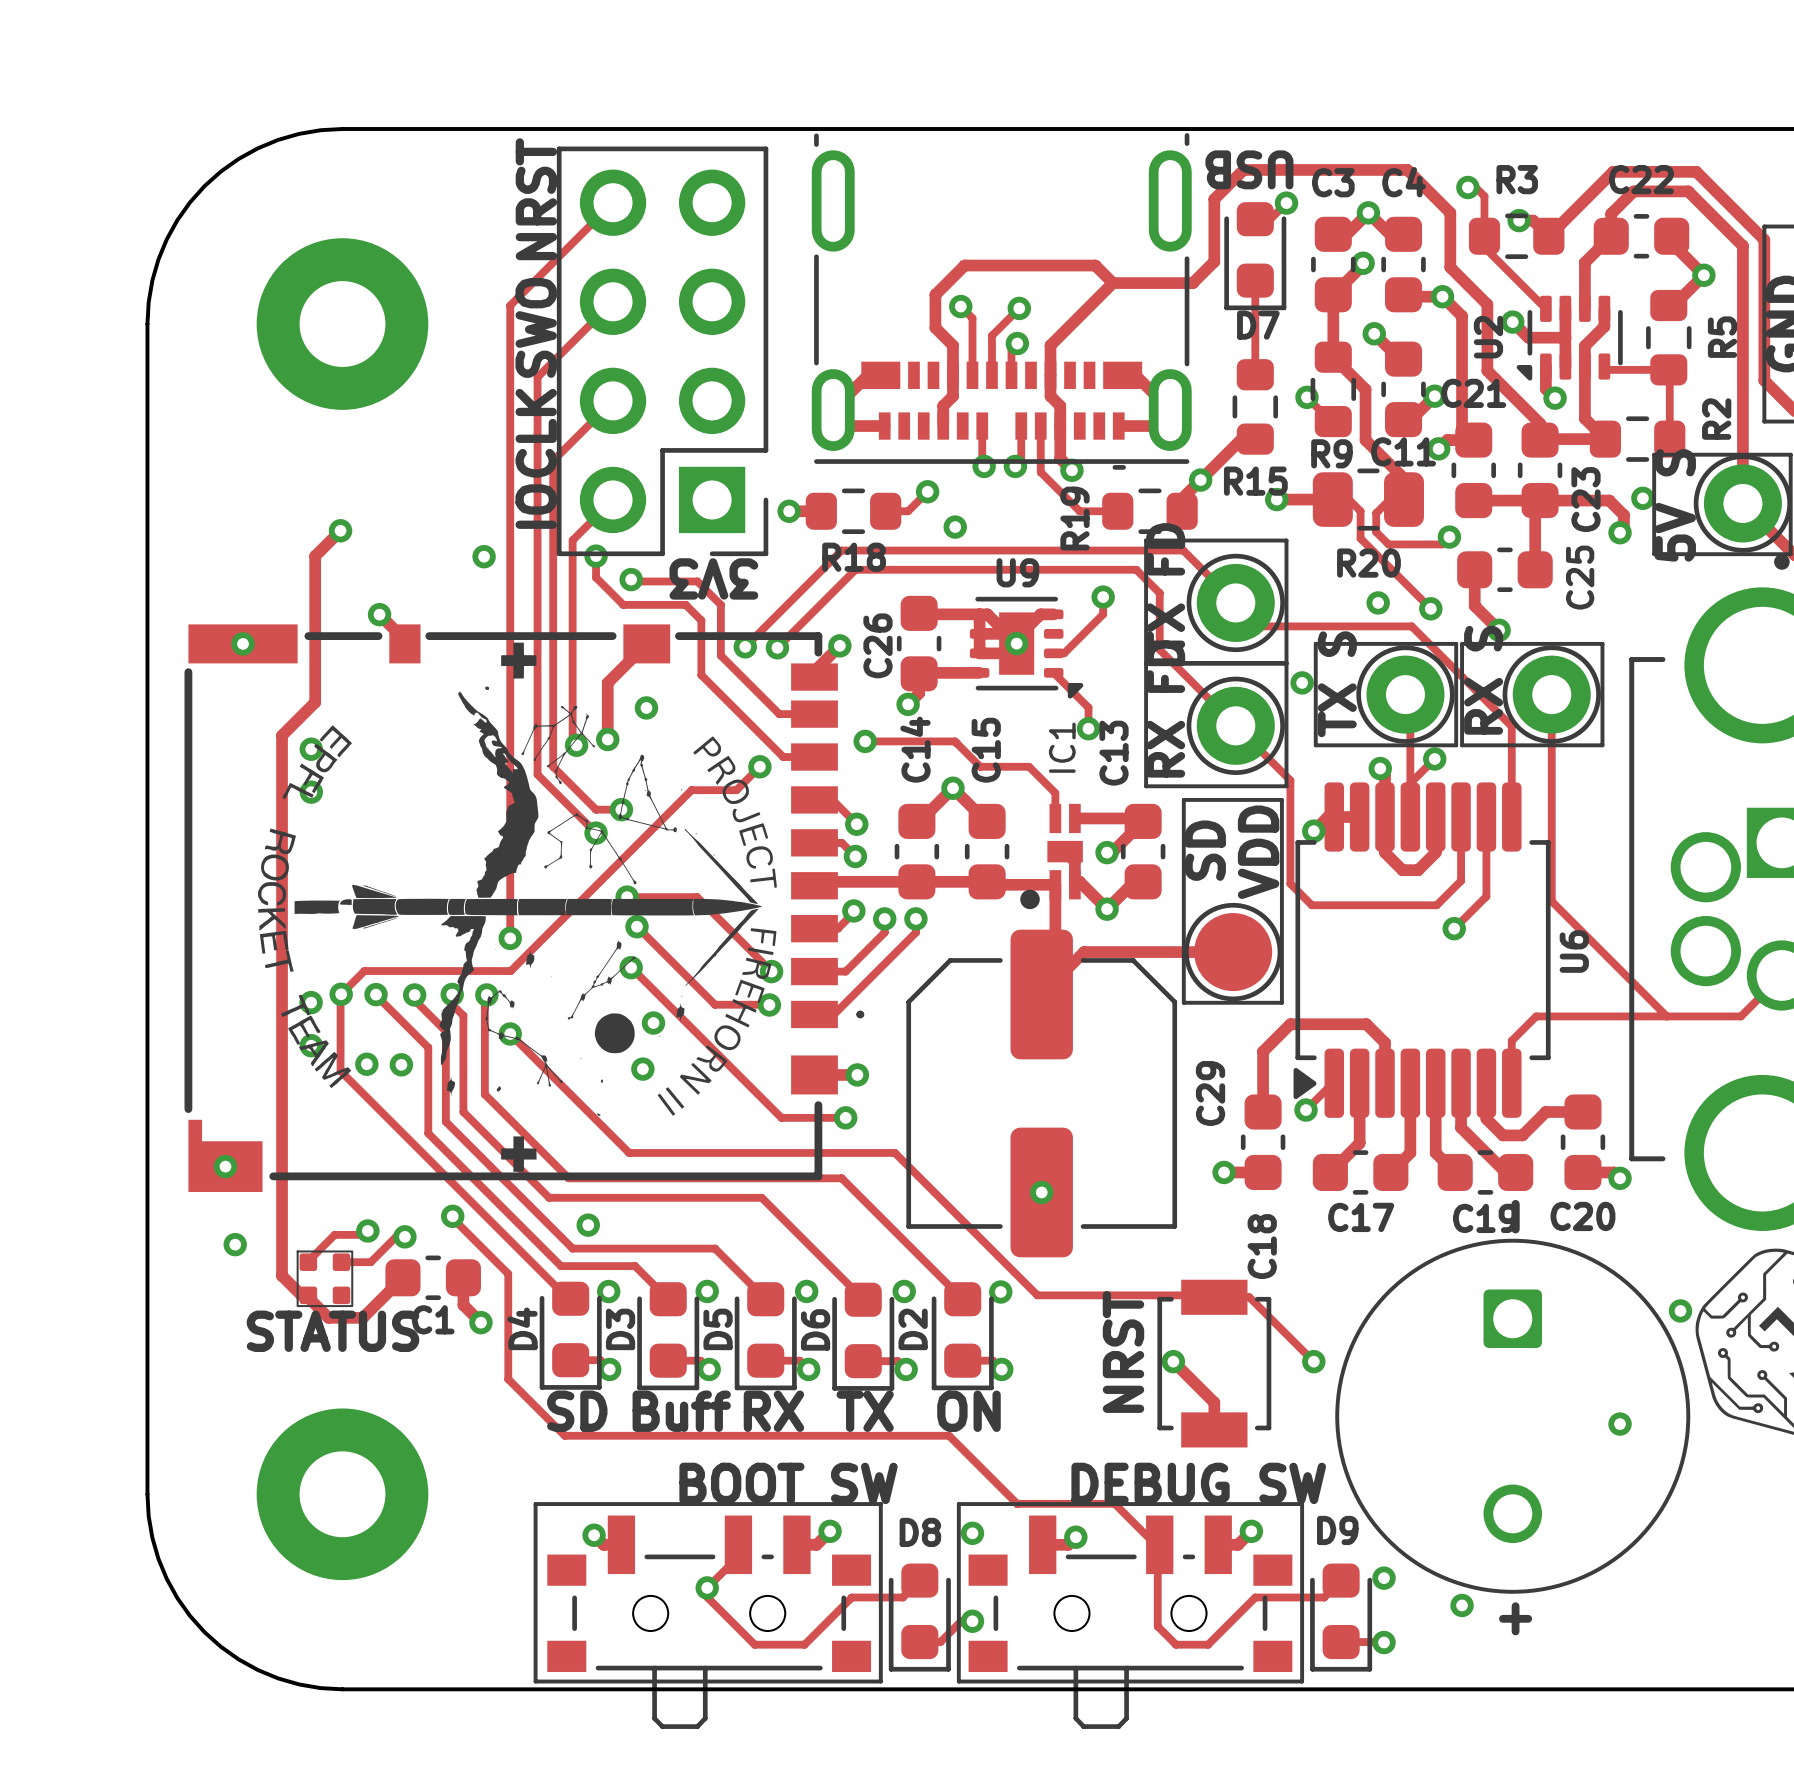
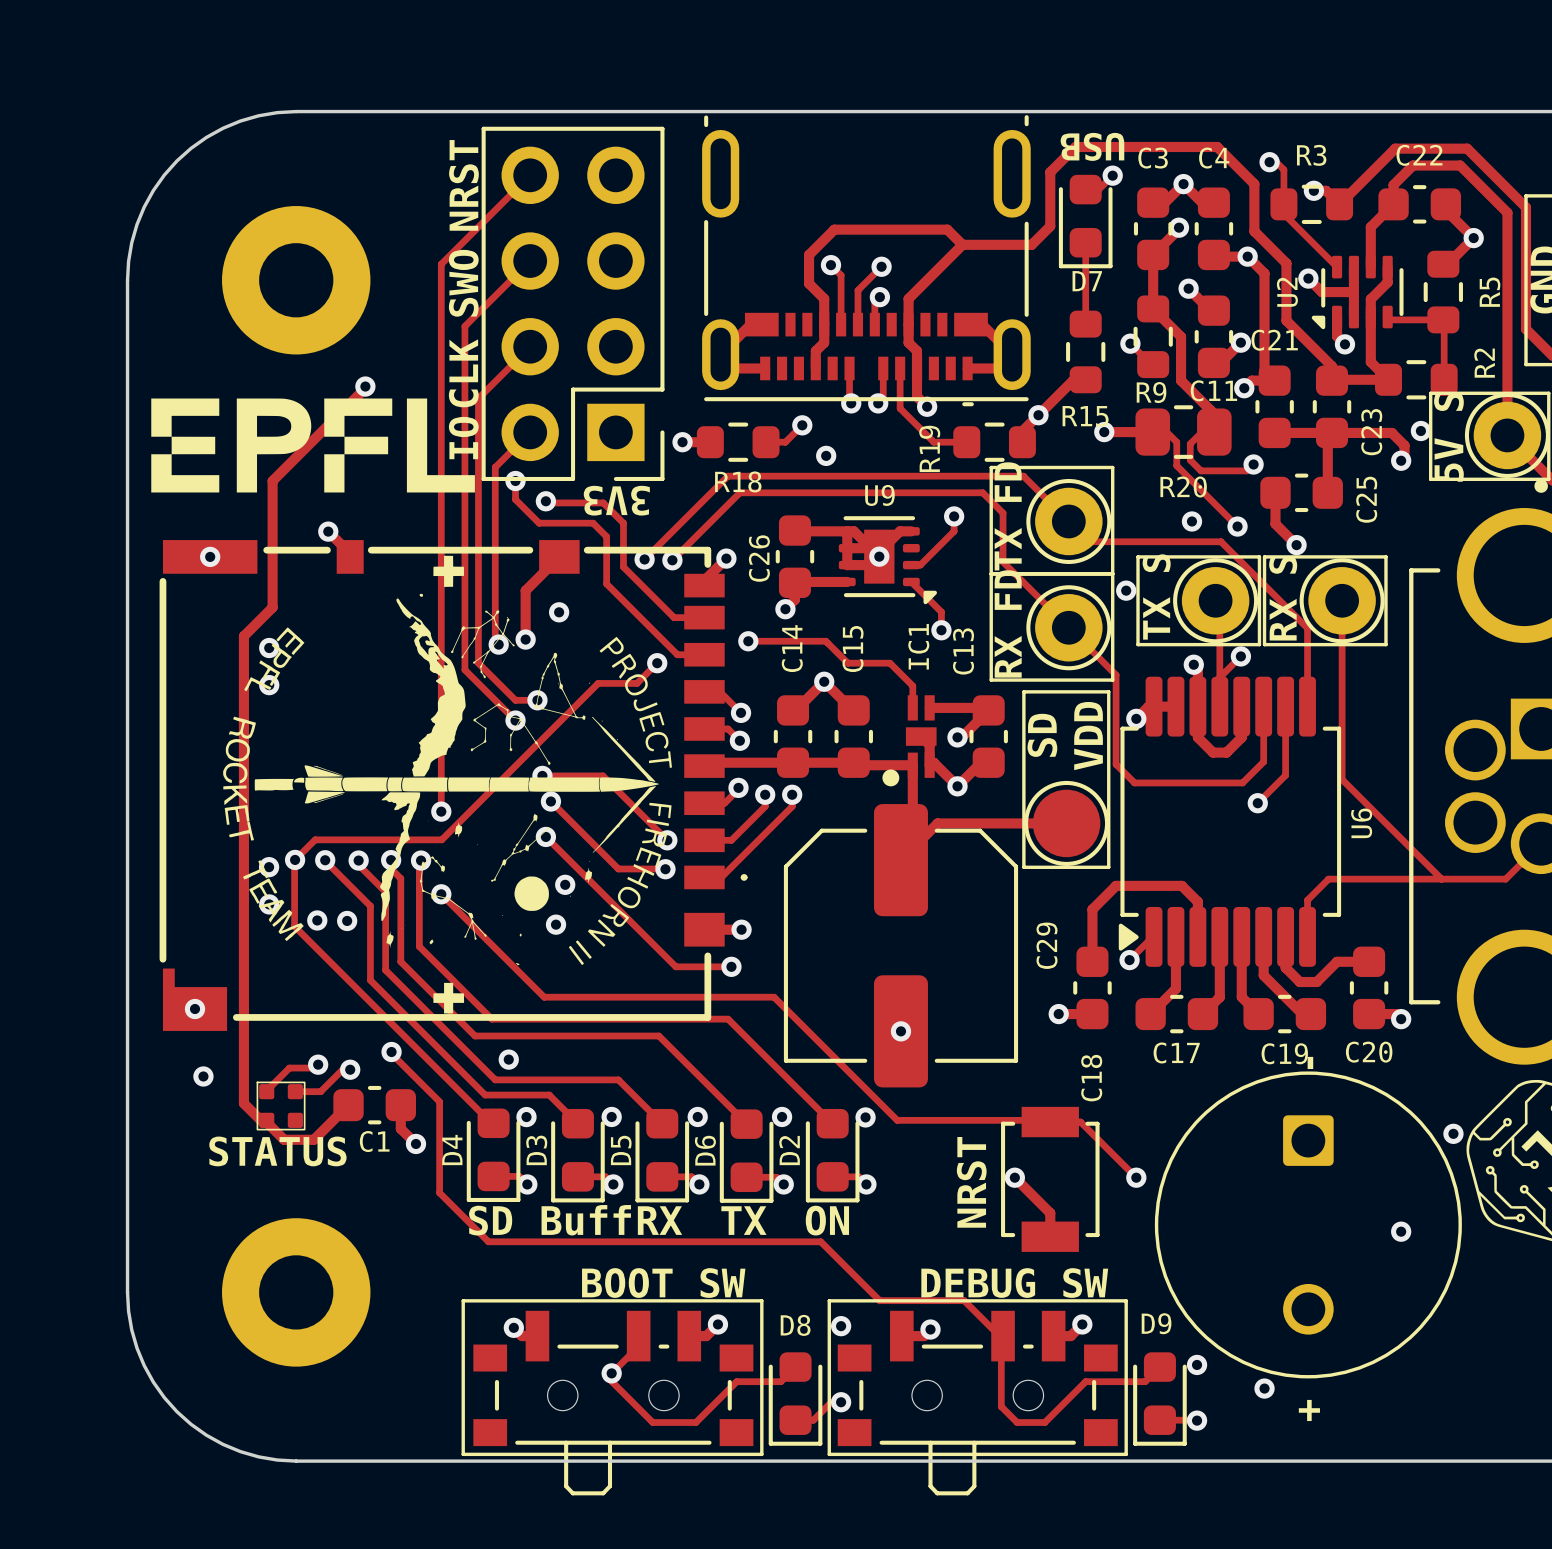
track: none -> (365, 386) (294, 459)
drawing: none -> [151, 398, 475, 493]
via position: (340, 530) -> (365, 386)

